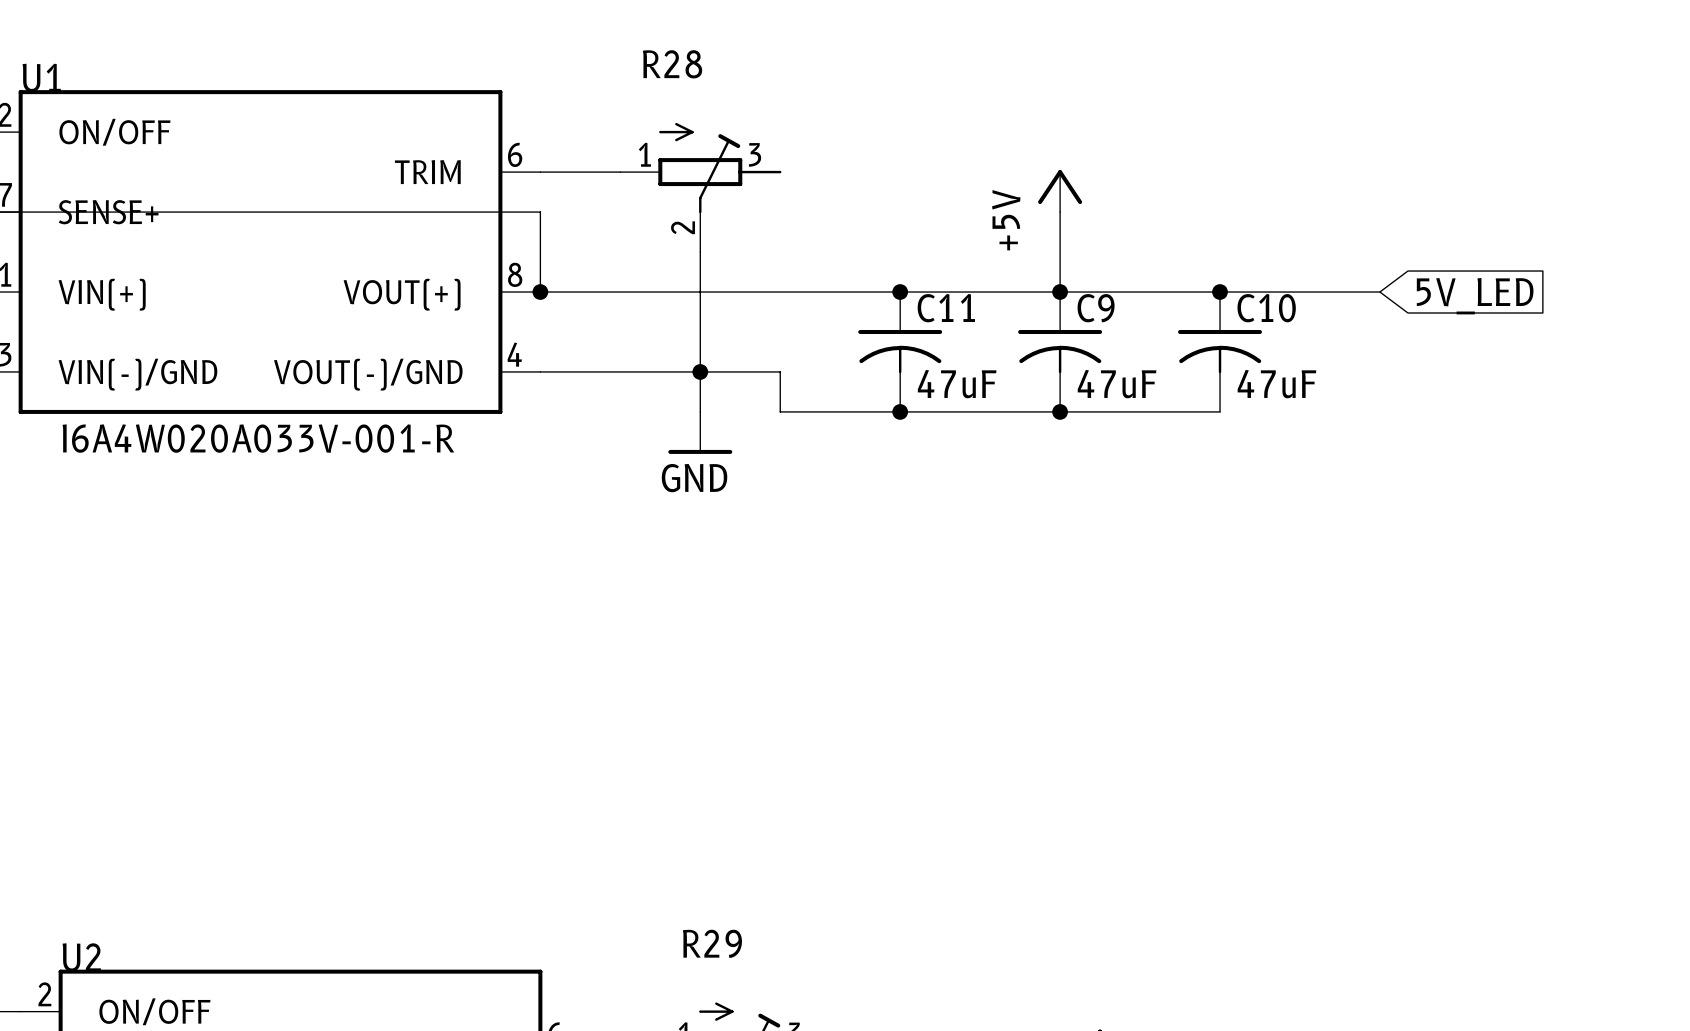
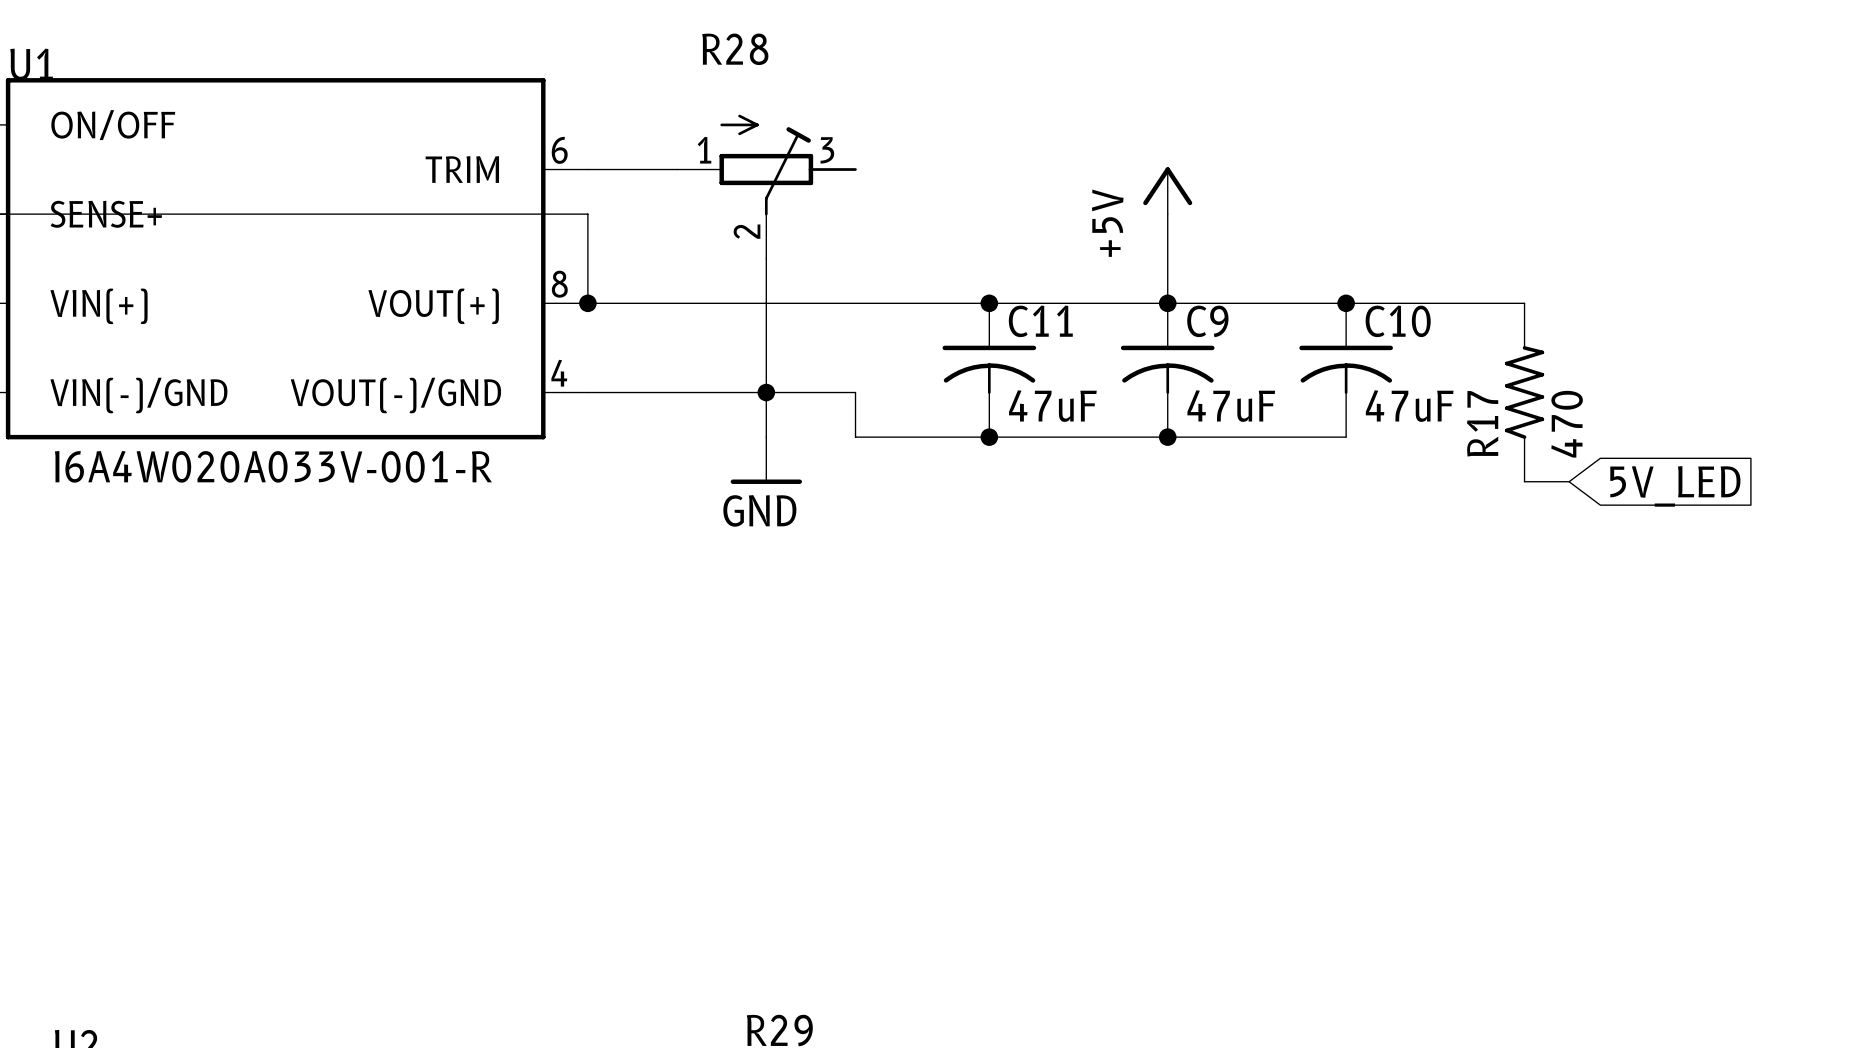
global label position: 5V_LED (1475, 296) -> 5V_LED (1675, 486)
R17: none -> 470 (1524, 392)
wire: none -> (1524, 481) (1569, 481)

